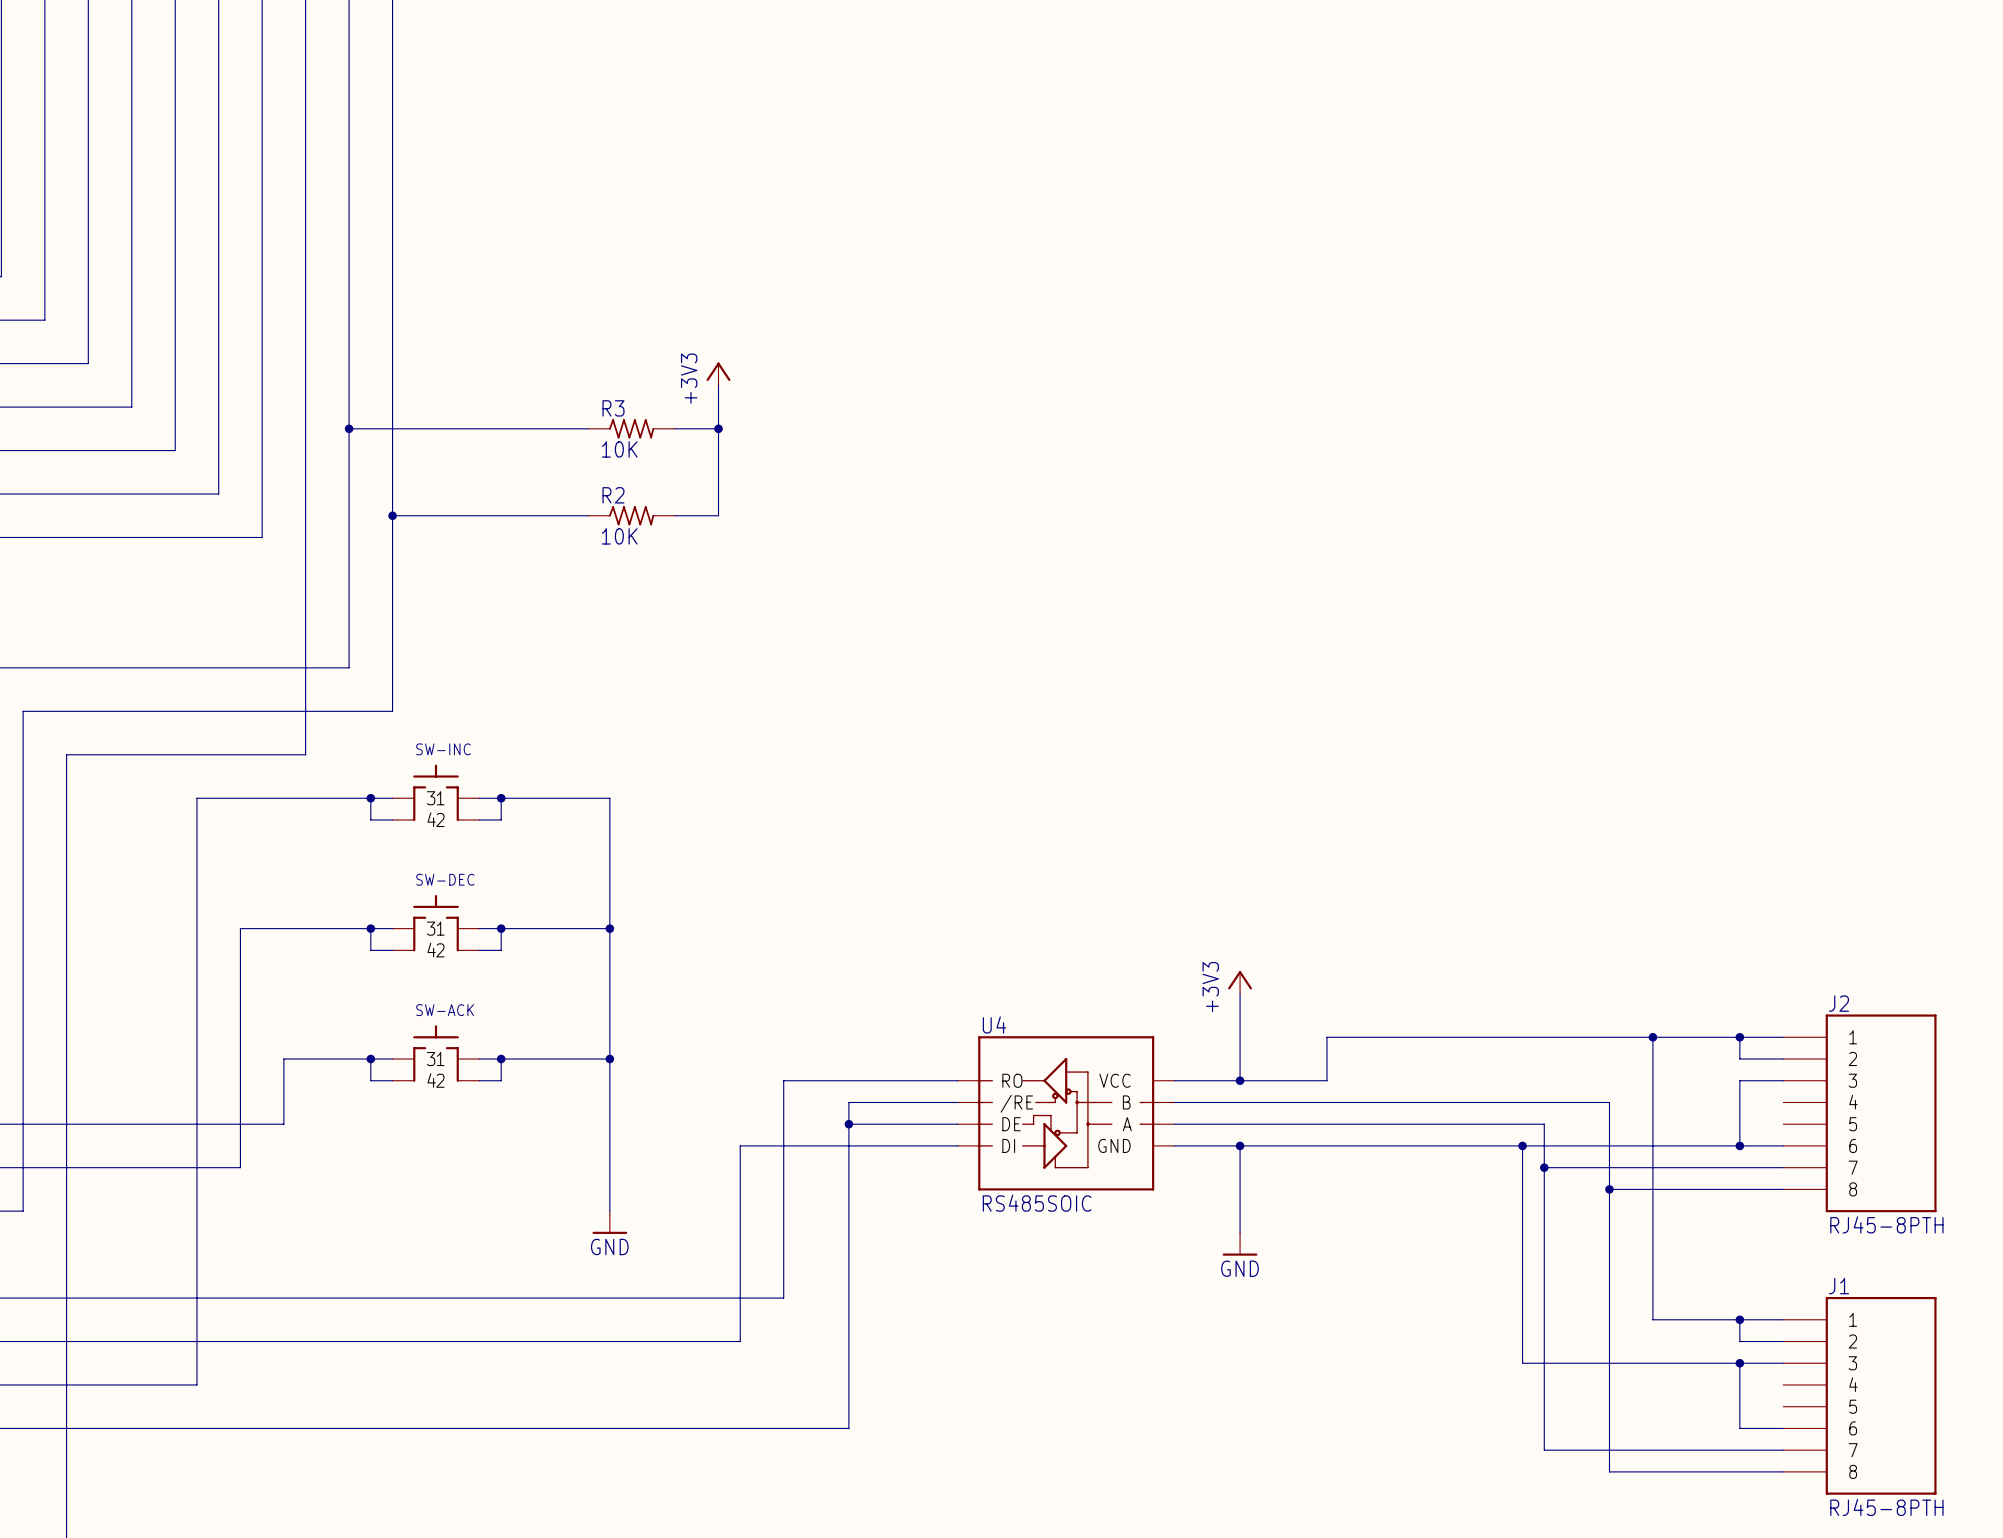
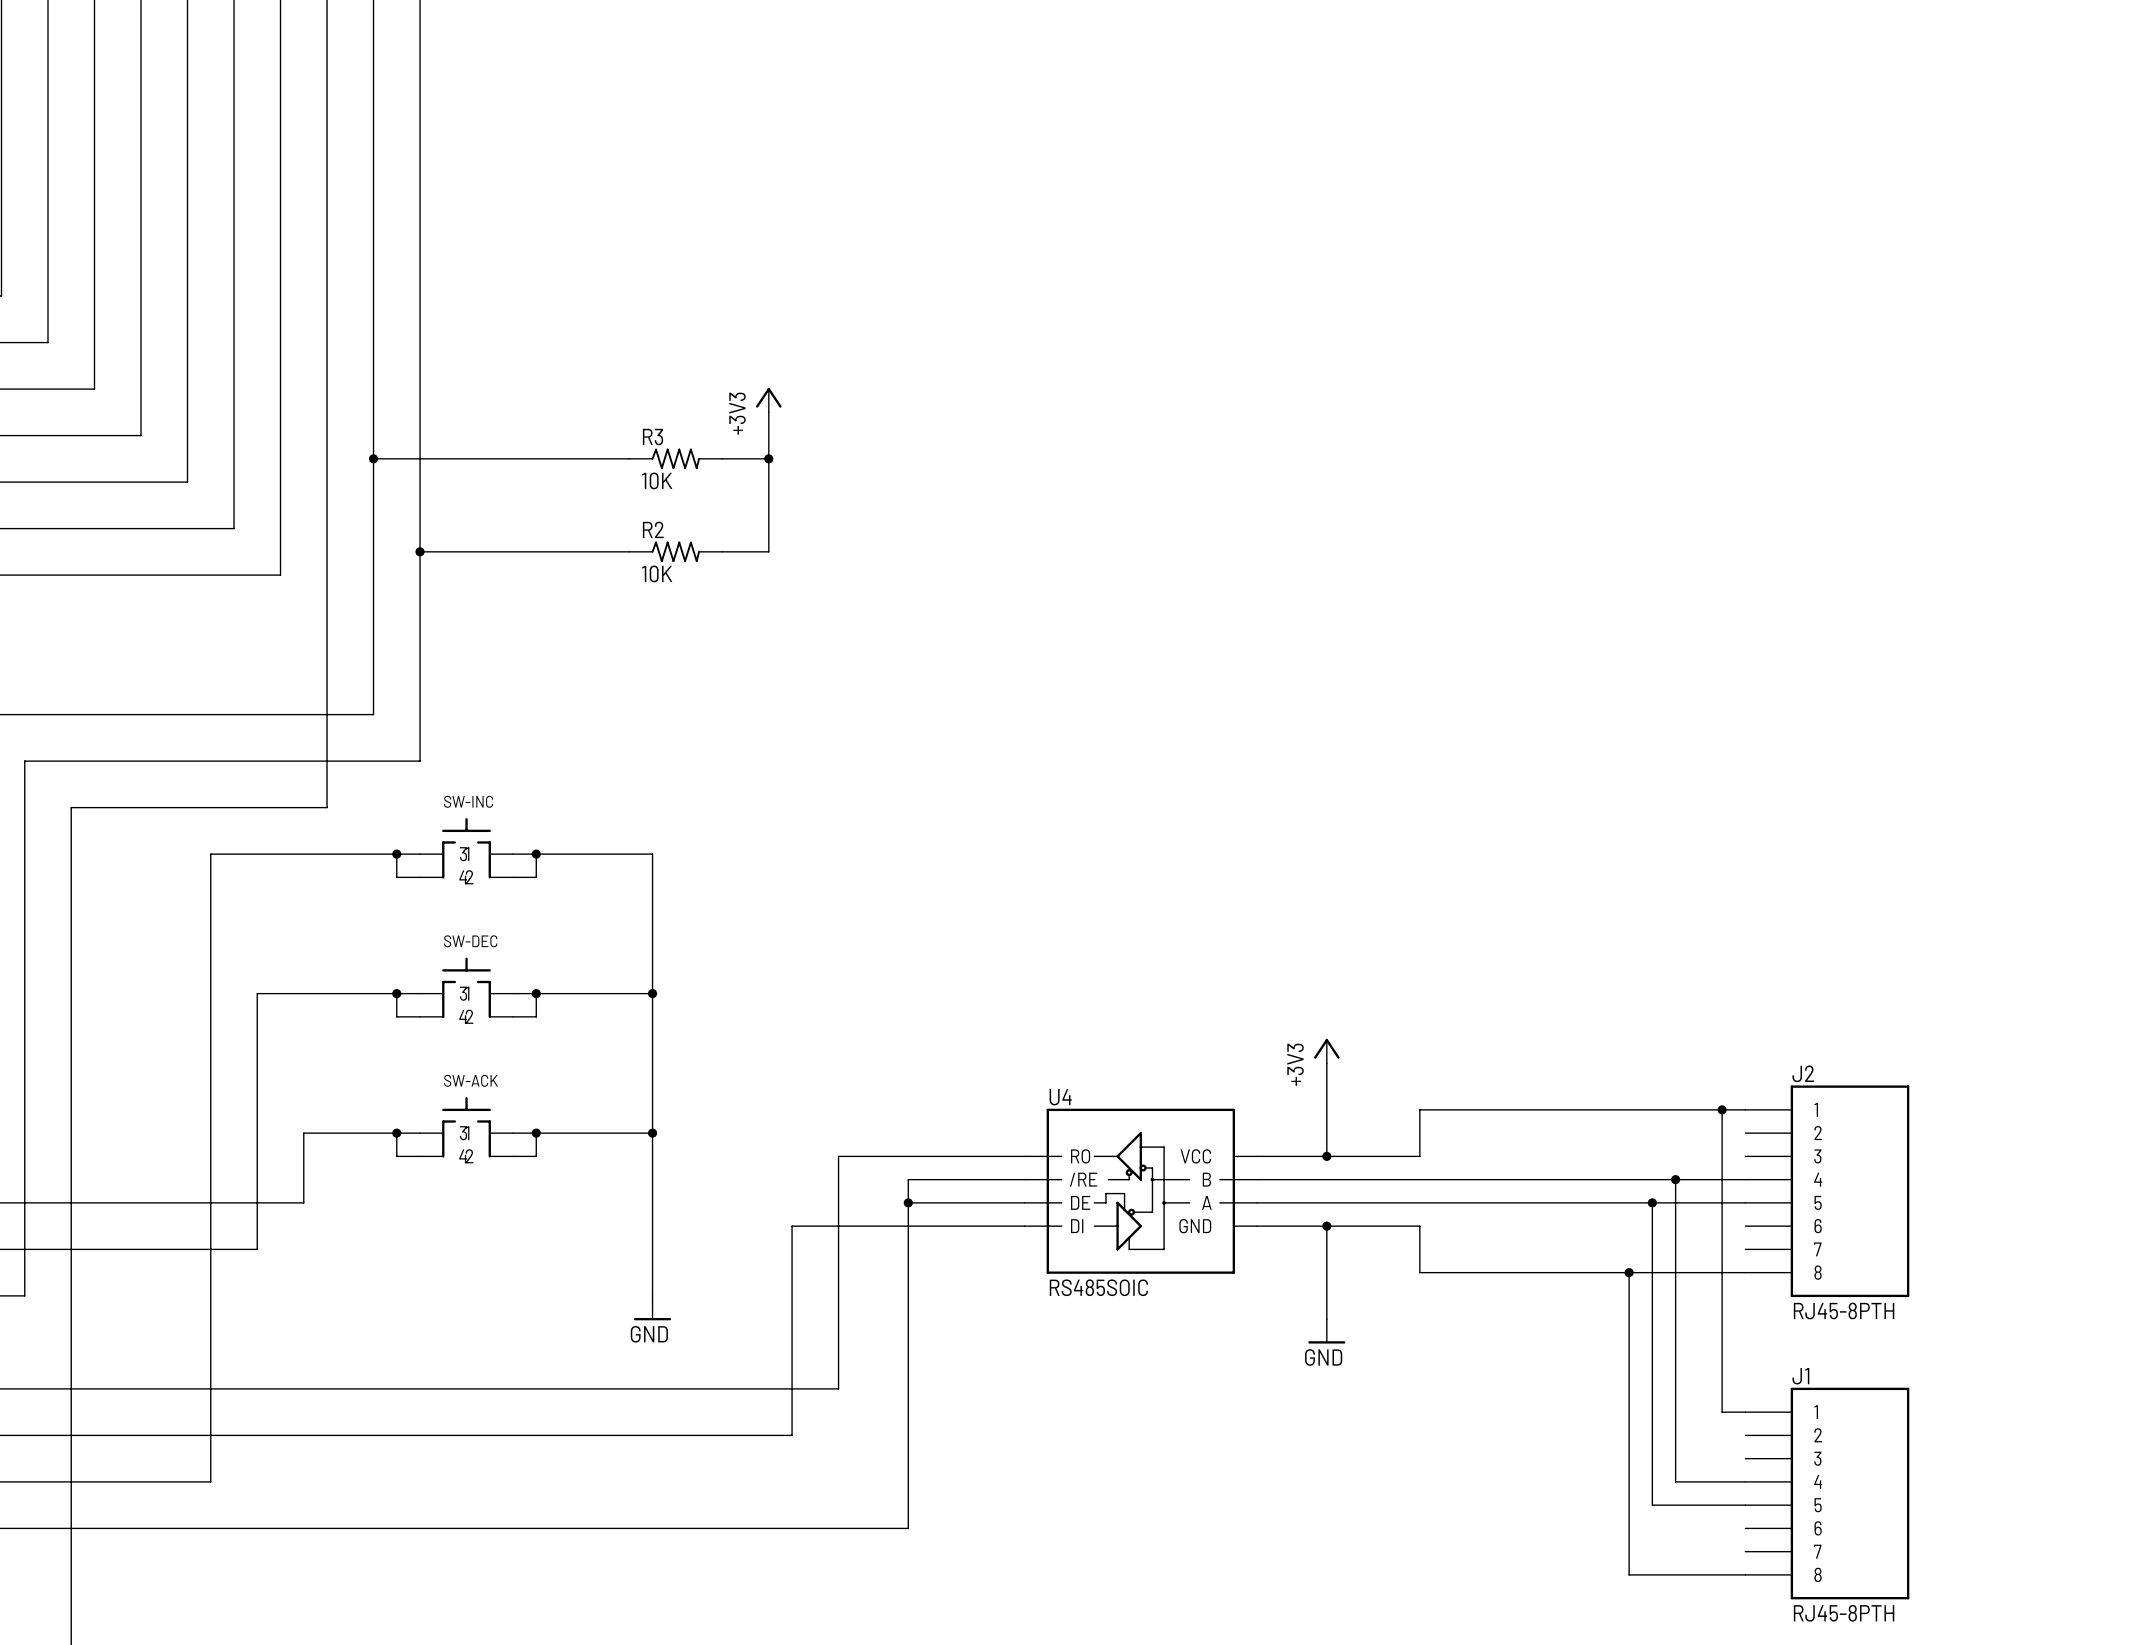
wire: none -> (1722, 1109) (1722, 1179) (1745, 1179)
wire: (1631, 1037) (1783, 1037) -> none
wire: (1652, 1037) (1652, 1319) (1783, 1319) -> none
junction position: (1652, 1037) -> (1722, 1109)
wire: (1739, 1037) (1739, 1059) (1783, 1059) -> none
junction: (1739, 1037) -> none
wire: (1783, 1080) (1739, 1080) (1739, 1145) -> none
wire: none -> (1675, 1179) (1675, 1481) (1745, 1481)
junction: none -> (1675, 1179)
J2 position: (1859, 1113) -> (1827, 1191)
wire: none -> (1652, 1202) (1745, 1202)
junction: none -> (1652, 1202)
wire: (1326, 1145) (1783, 1145) -> (1419, 1226) (1419, 1272) (1722, 1272)
wire: (1522, 1145) (1522, 1189) -> none
junction: (1522, 1145) -> none
junction: (1739, 1145) -> none
wire: (1544, 1167) (1783, 1167) -> none
junction: (1544, 1167) -> none
junction: none -> (1629, 1272)
junction: (1609, 1189) -> none
wire: (1631, 1189) (1783, 1189) -> none
wire: (1609, 1319) (1609, 1471) -> (1629, 1458) (1629, 1574) (1722, 1574)
wire: none -> (1722, 1412) (1745, 1412)
wire: (1739, 1319) (1739, 1341) (1783, 1341) -> none
junction: (1739, 1319) -> none
wire: (1522, 1363) (1783, 1363) -> none
wire: (1739, 1363) (1739, 1428) (1783, 1428) -> none
junction: (1739, 1363) -> none
J1 position: (1859, 1395) -> (1827, 1493)
wire: (1544, 1406) (1544, 1450) (1783, 1450) -> (1652, 1505) (1745, 1505)
wire: (1631, 1471) (1783, 1471) -> none

